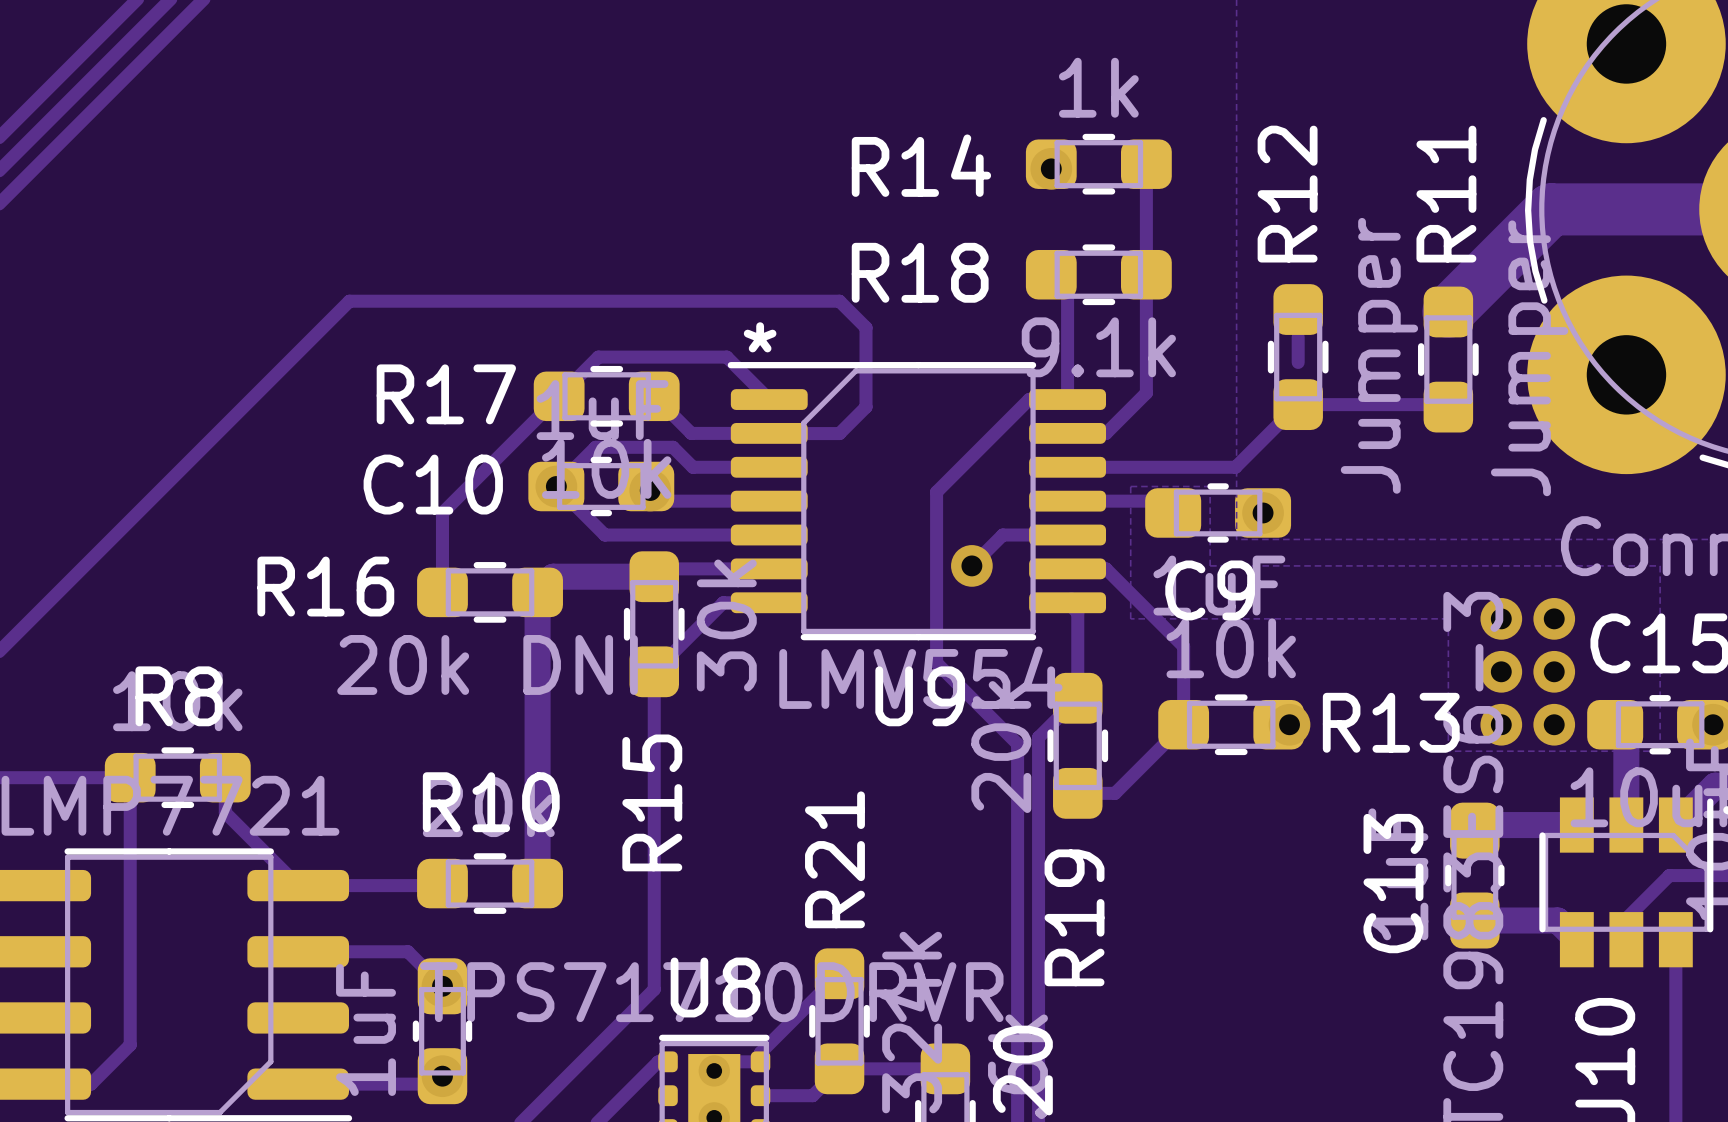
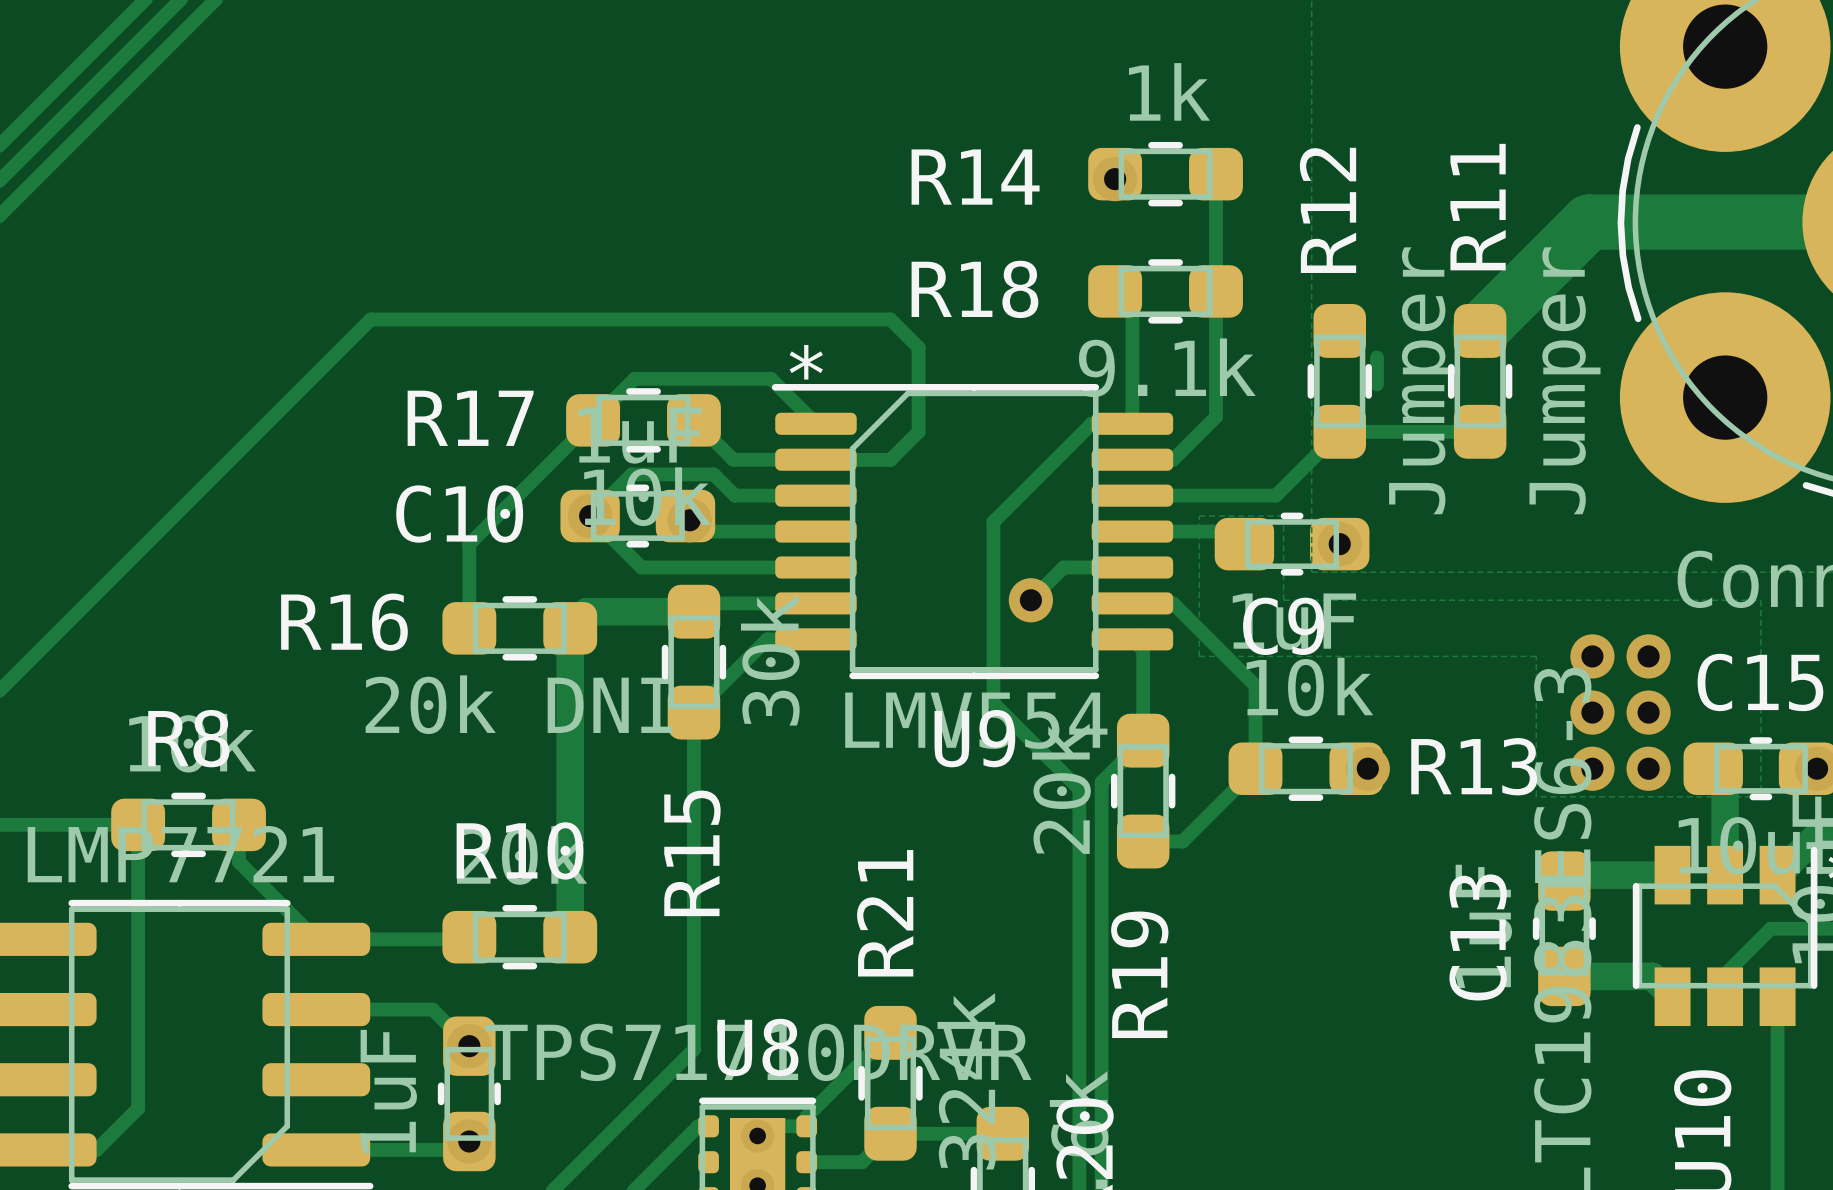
track: (1550, 209) (1448, 312) -> (1645, 222) (1588, 222) (1480, 330)
R12 position: (1298, 357) -> (1339, 381)
R11 position: (1448, 359) -> (1480, 381)
track: (1448, 407) (1445, 404) (1298, 404) (1235, 467) (1202, 467) -> (1480, 431) (1339, 431) (1275, 495)

